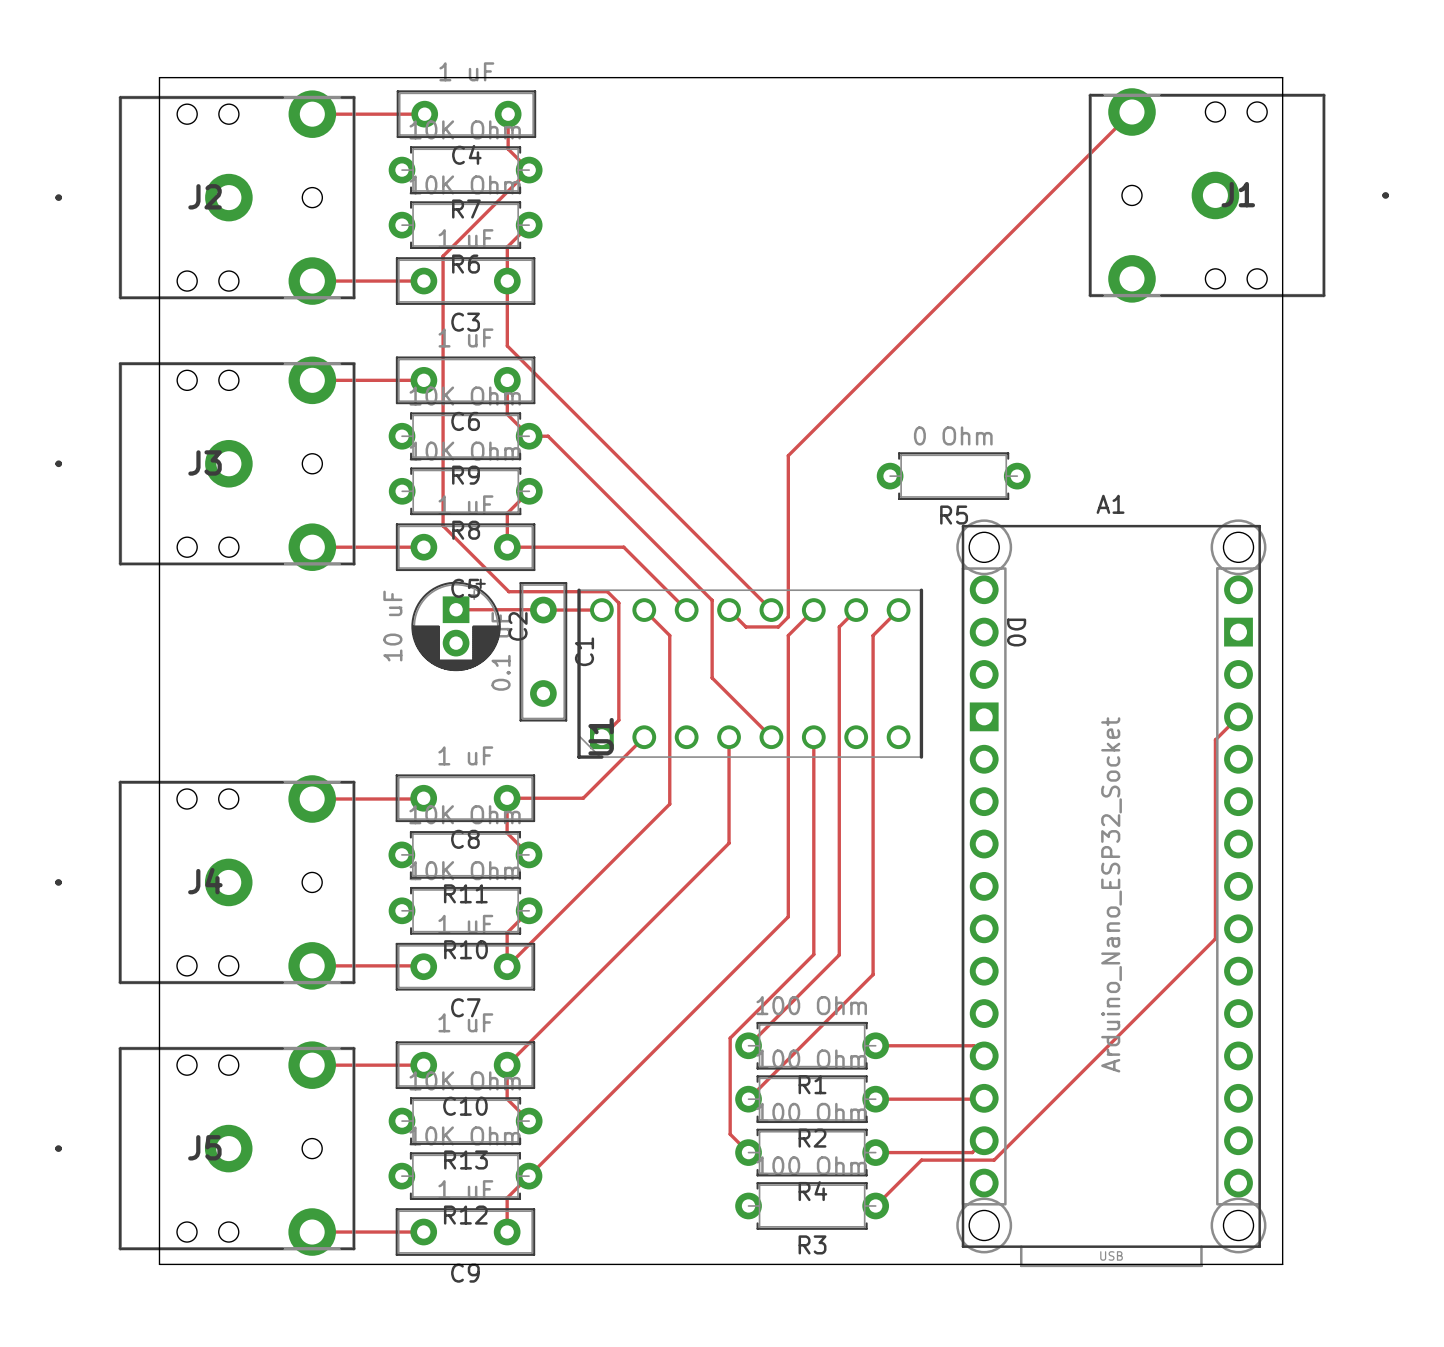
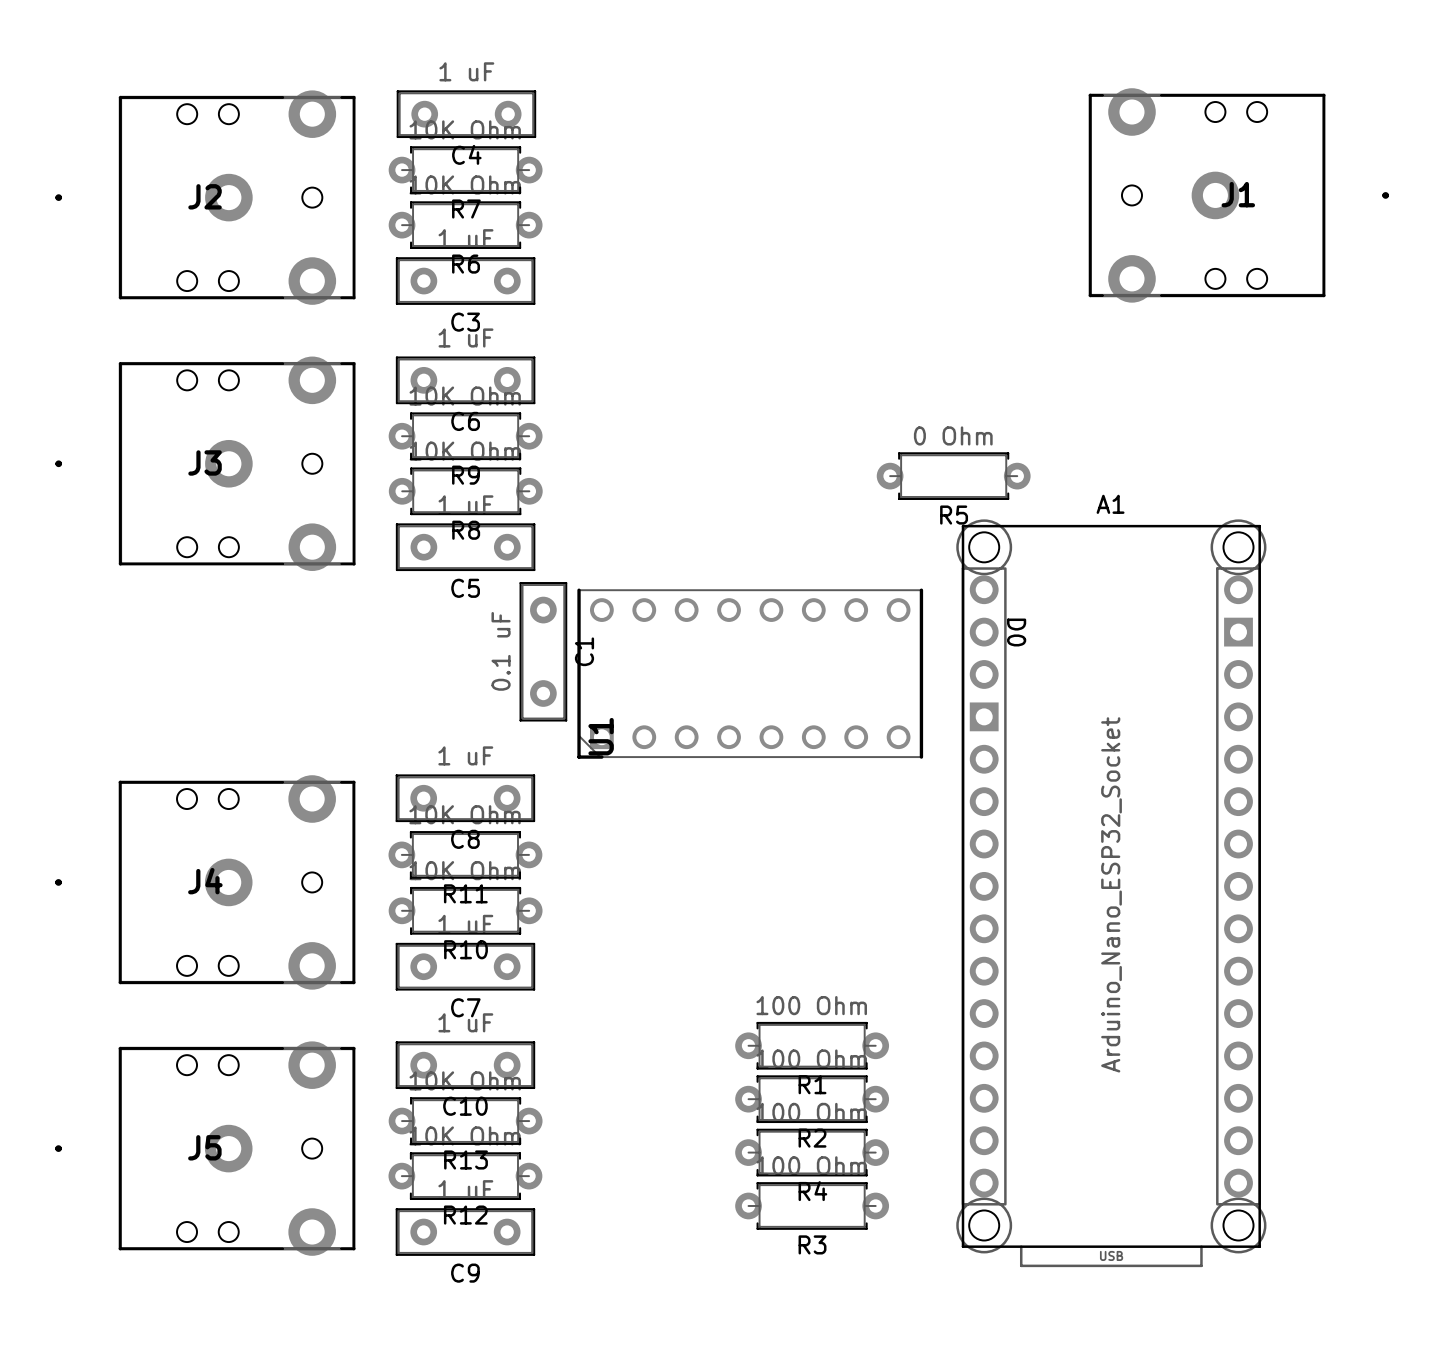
board edge: (159, 77) (1282, 77) (1282, 1264) (159, 1264) (159, 77) -> none
track: (1131, 112) (788, 455) (788, 617) (778, 626) (745, 626) (729, 610) -> none
track: (312, 114) (424, 114) -> none
track: (508, 114) (508, 149) (529, 170) (443, 256) (443, 525) (508, 591) (607, 591) (618, 603) (618, 720) (601, 737) -> none
track: (529, 225) (507, 247) (507, 345) (771, 610) -> none
track: (312, 281) (423, 281) -> none
track: (312, 380) (423, 380) -> none
track: (507, 380) (507, 414) (529, 436) (548, 436) (712, 600) (712, 677) (771, 737) -> none
track: (529, 491) (507, 513) (507, 547) (623, 547) (686, 610) -> none
track: (312, 547) (423, 547) -> none
track: (456, 609) (601, 610) -> none
track: (644, 610) (669, 635) (669, 804) (507, 966) (507, 932) (529, 910) -> none
track: (813, 610) (788, 635) (788, 916) (507, 1197) (507, 1232) -> none
track: (856, 610) (839, 626) (839, 955) (748, 1045) -> none
track: (898, 610) (873, 635) (873, 974) (748, 1099) -> none
C2: 10 uF (456, 624) -> none
track: (1238, 716) (1215, 739) (1215, 938) (994, 1160) (921, 1160) (875, 1205) -> none
track: (644, 737) (583, 798) (507, 798) (507, 833) (529, 854) -> none
track: (729, 737) (729, 843) (507, 1065) (507, 1099) (529, 1121) -> none
track: (813, 737) (813, 954) (730, 1038) (730, 1134) (748, 1152) -> none
track: (423, 798) (312, 799) -> none
track: (312, 965) (423, 966) -> none
track: (875, 1045) (974, 1045) (984, 1055) -> none
track: (312, 1065) (423, 1065) -> none
track: (984, 1098) (875, 1099) -> none
track: (984, 1140) (972, 1152) (875, 1152) -> none
track: (312, 1232) (423, 1232) -> none

